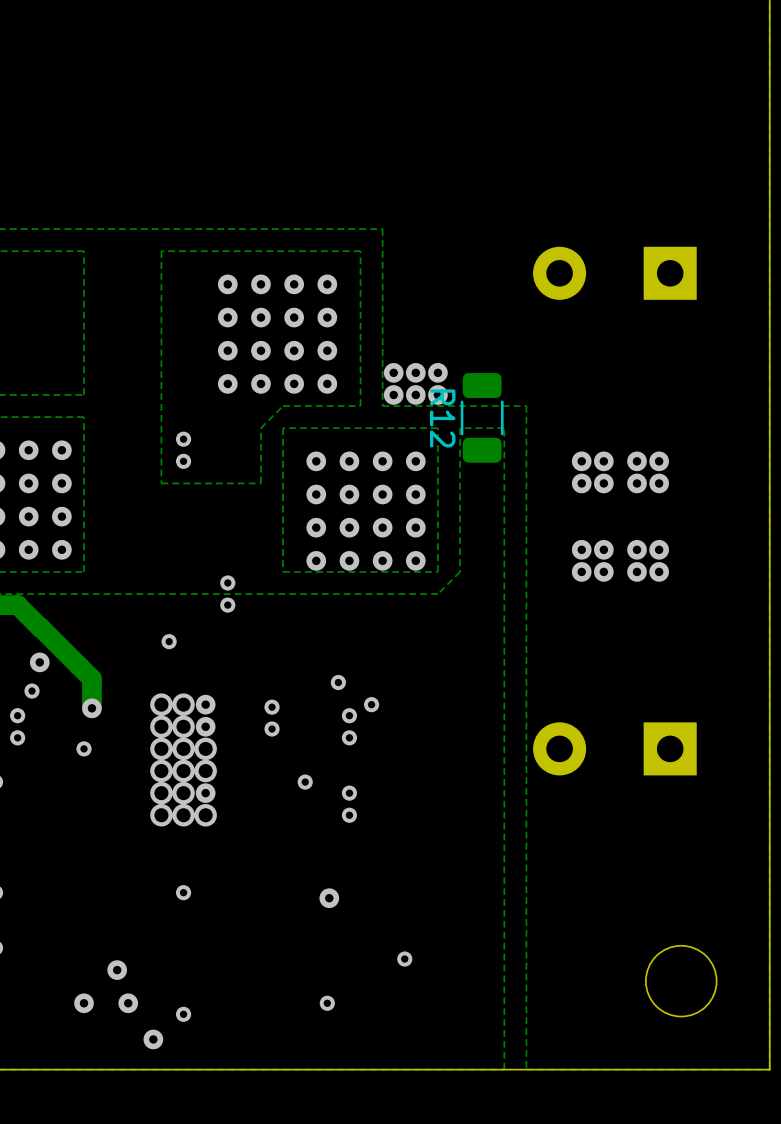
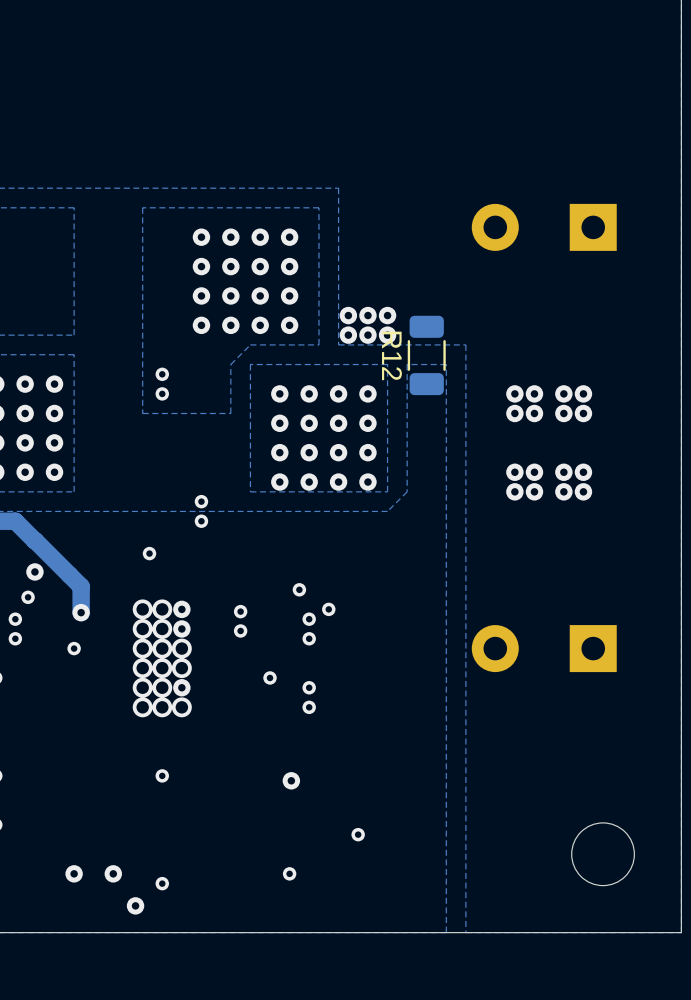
via: (117, 970) -> none

